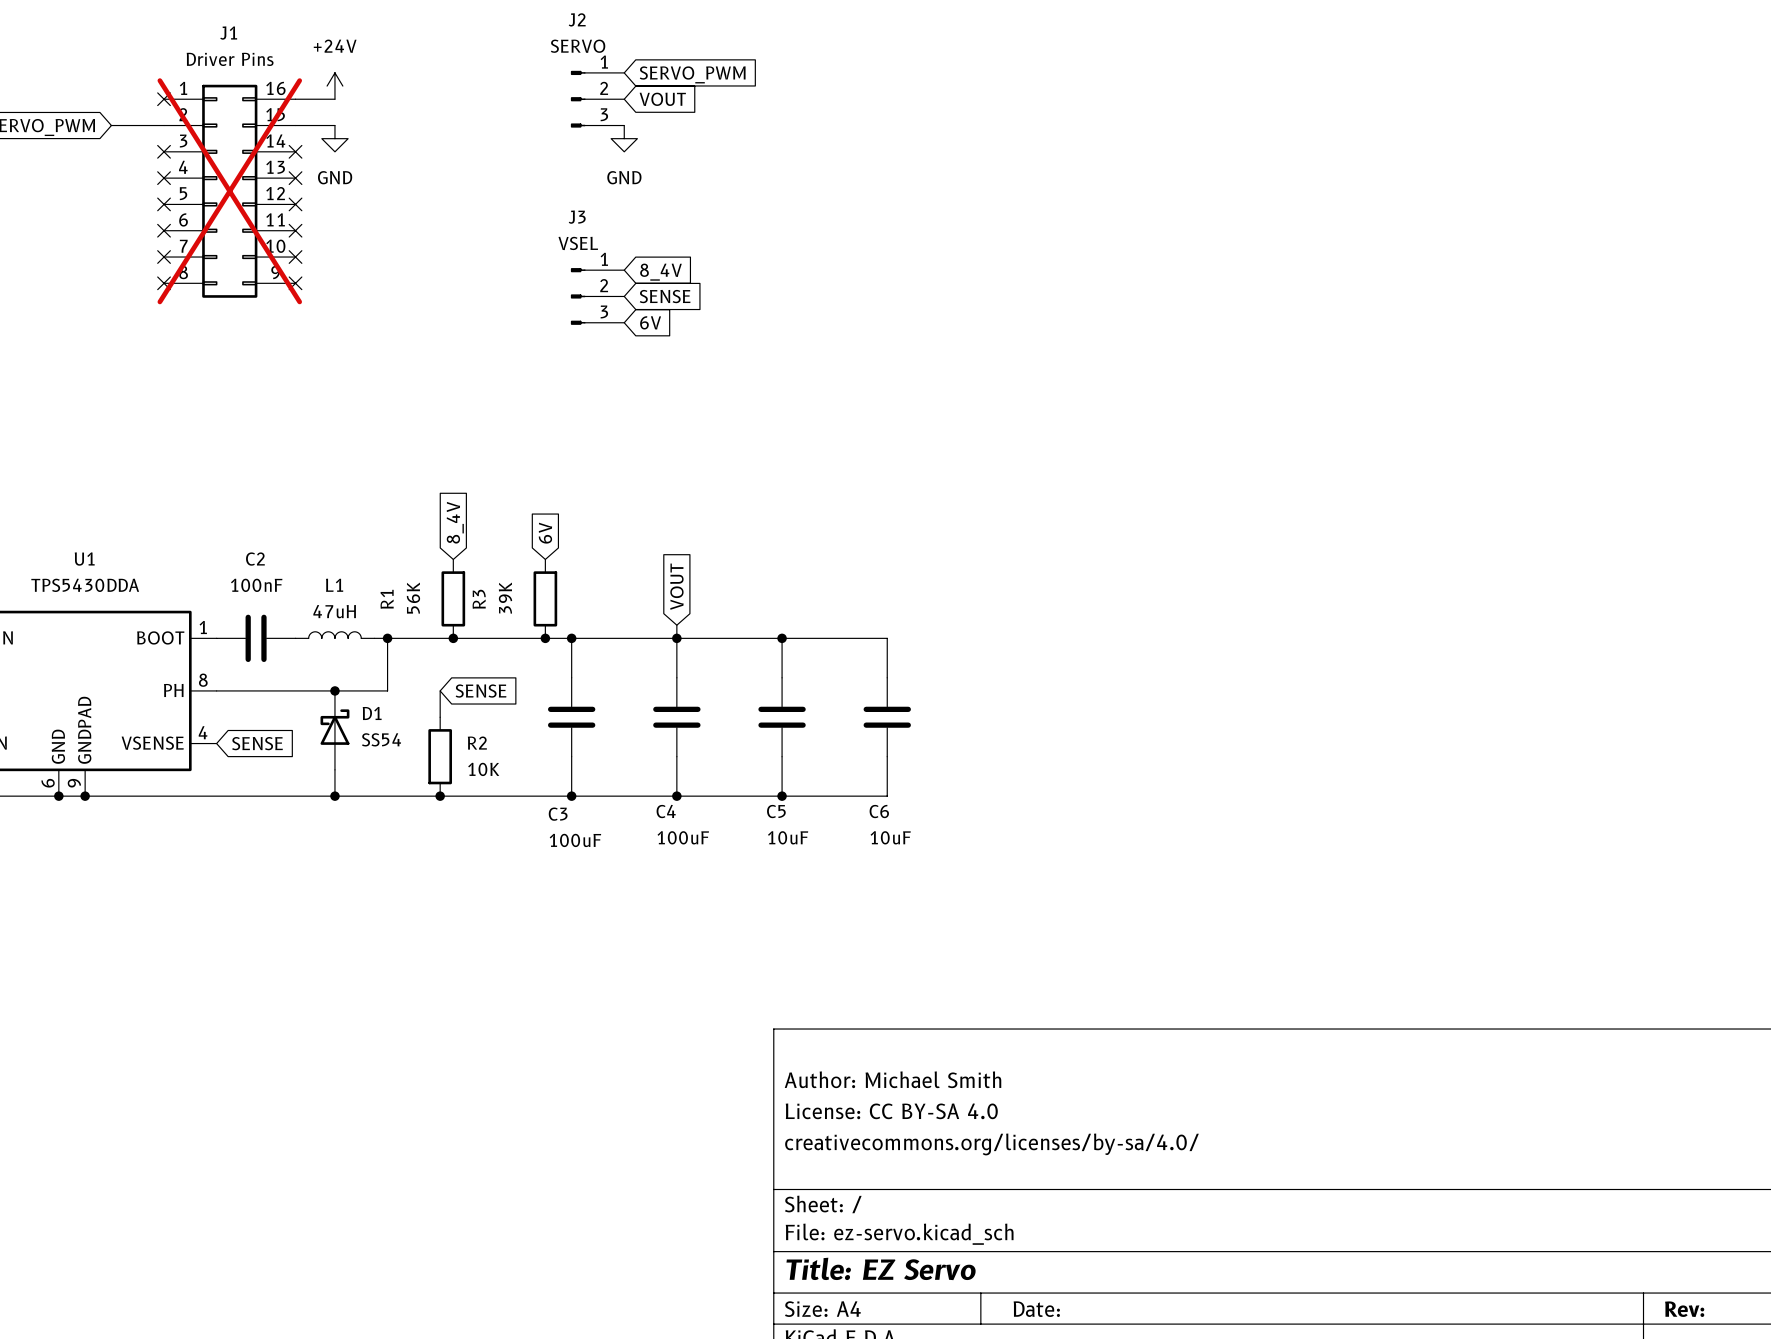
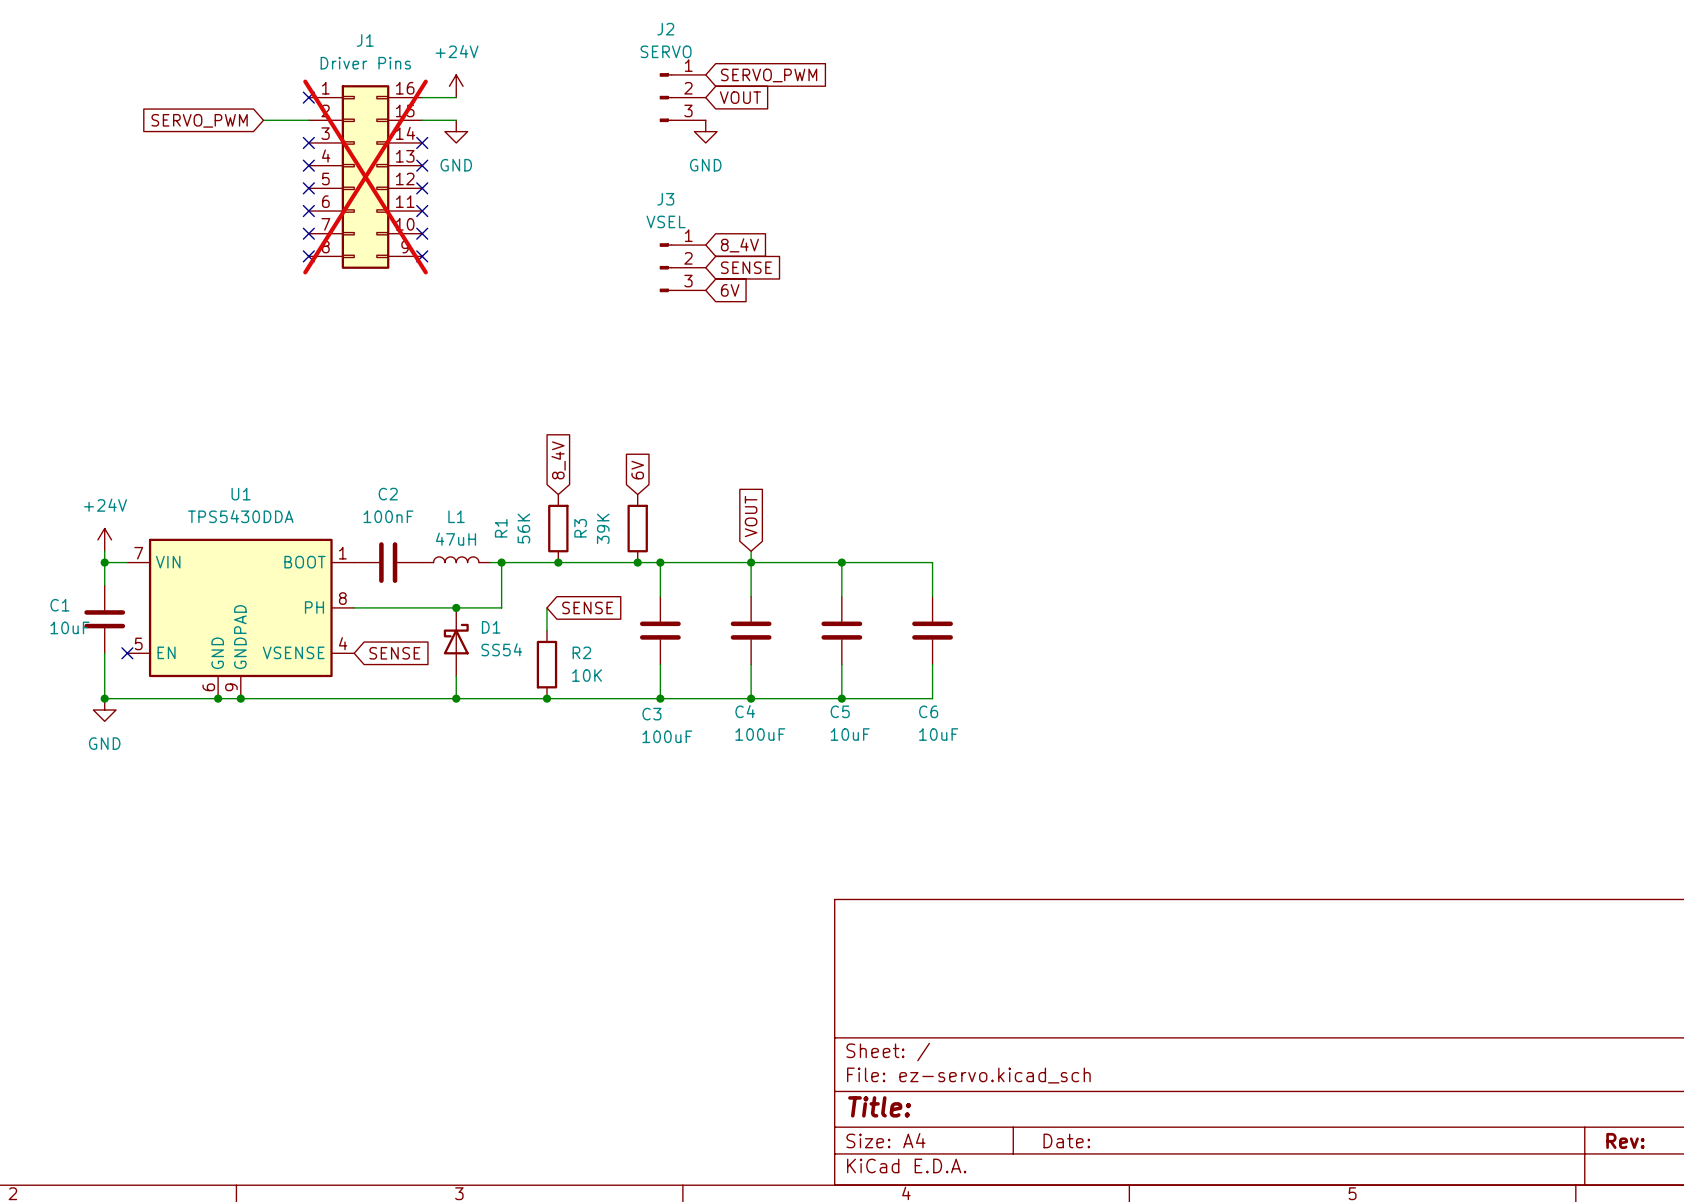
title block: Author: Michael Smith (893, 1079) -> none
title block: License: CC BY-SA 4.0 (891, 1111) -> none
title block: creativecommons.org/licenses/by-sa/4.0/ (991, 1144) -> none
title block: Title: EZ Servo (881, 1268) -> Title: (879, 1106)

